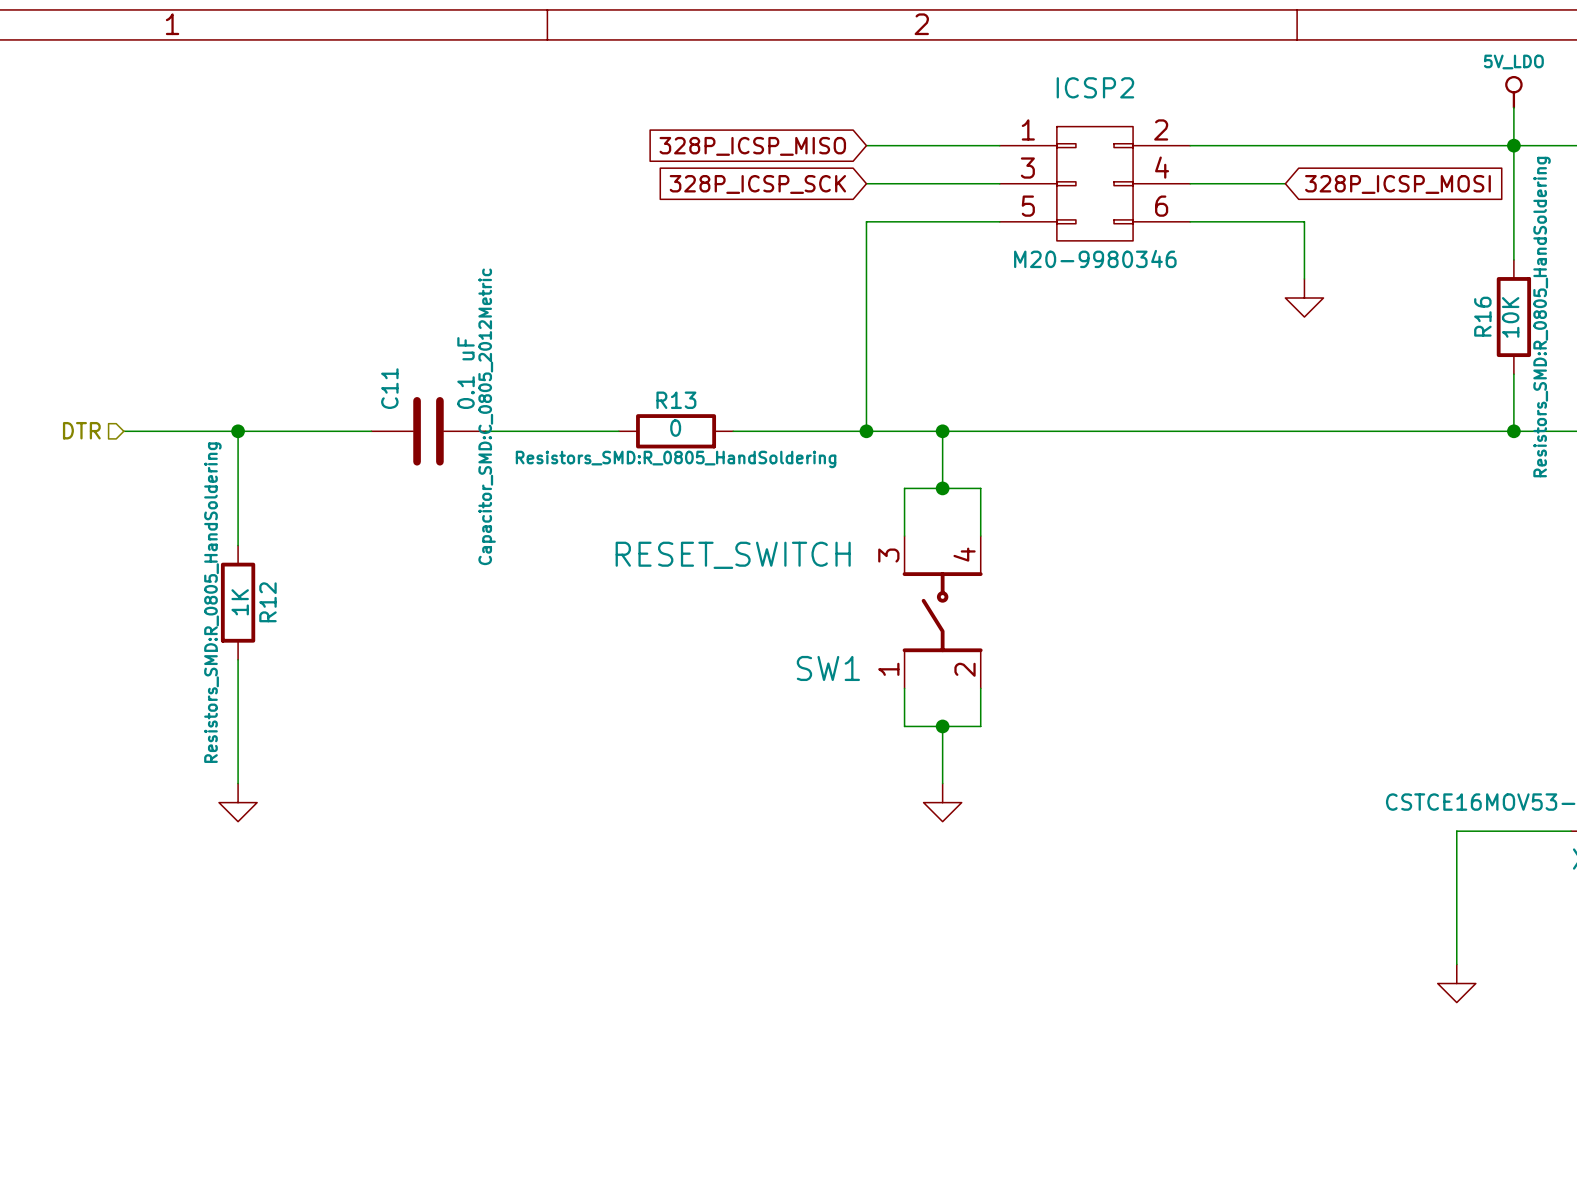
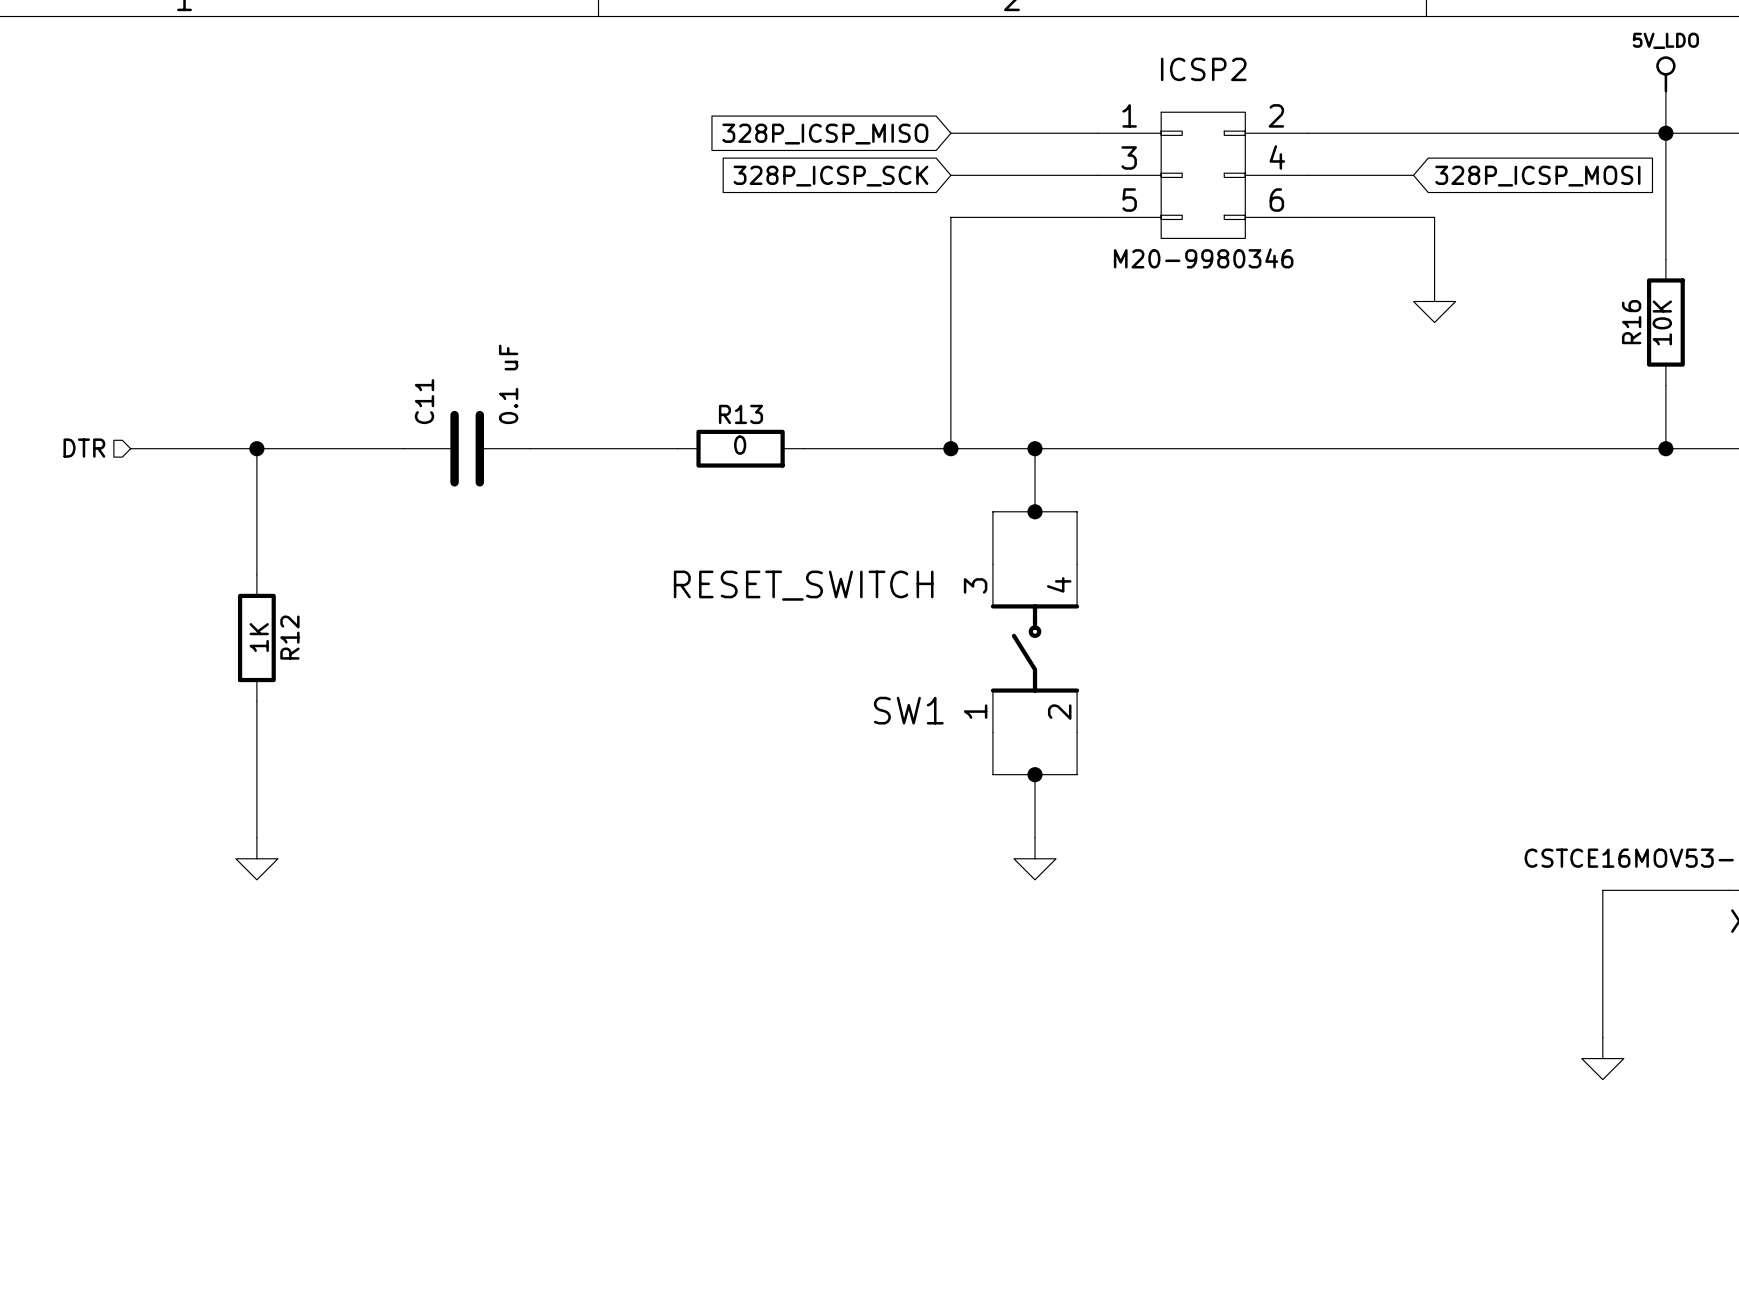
R16 text: Resistors_SMD:R_0805_HandSoldering (1542, 317) -> none
C11 text: Capacitor_SMD:C_0805_2012Metric (487, 416) -> none
R13 text: Resistors_SMD:R_0805_HandSoldering (676, 459) -> none
R12 text: Resistors_SMD:R_0805_HandSoldering (212, 602) -> none

